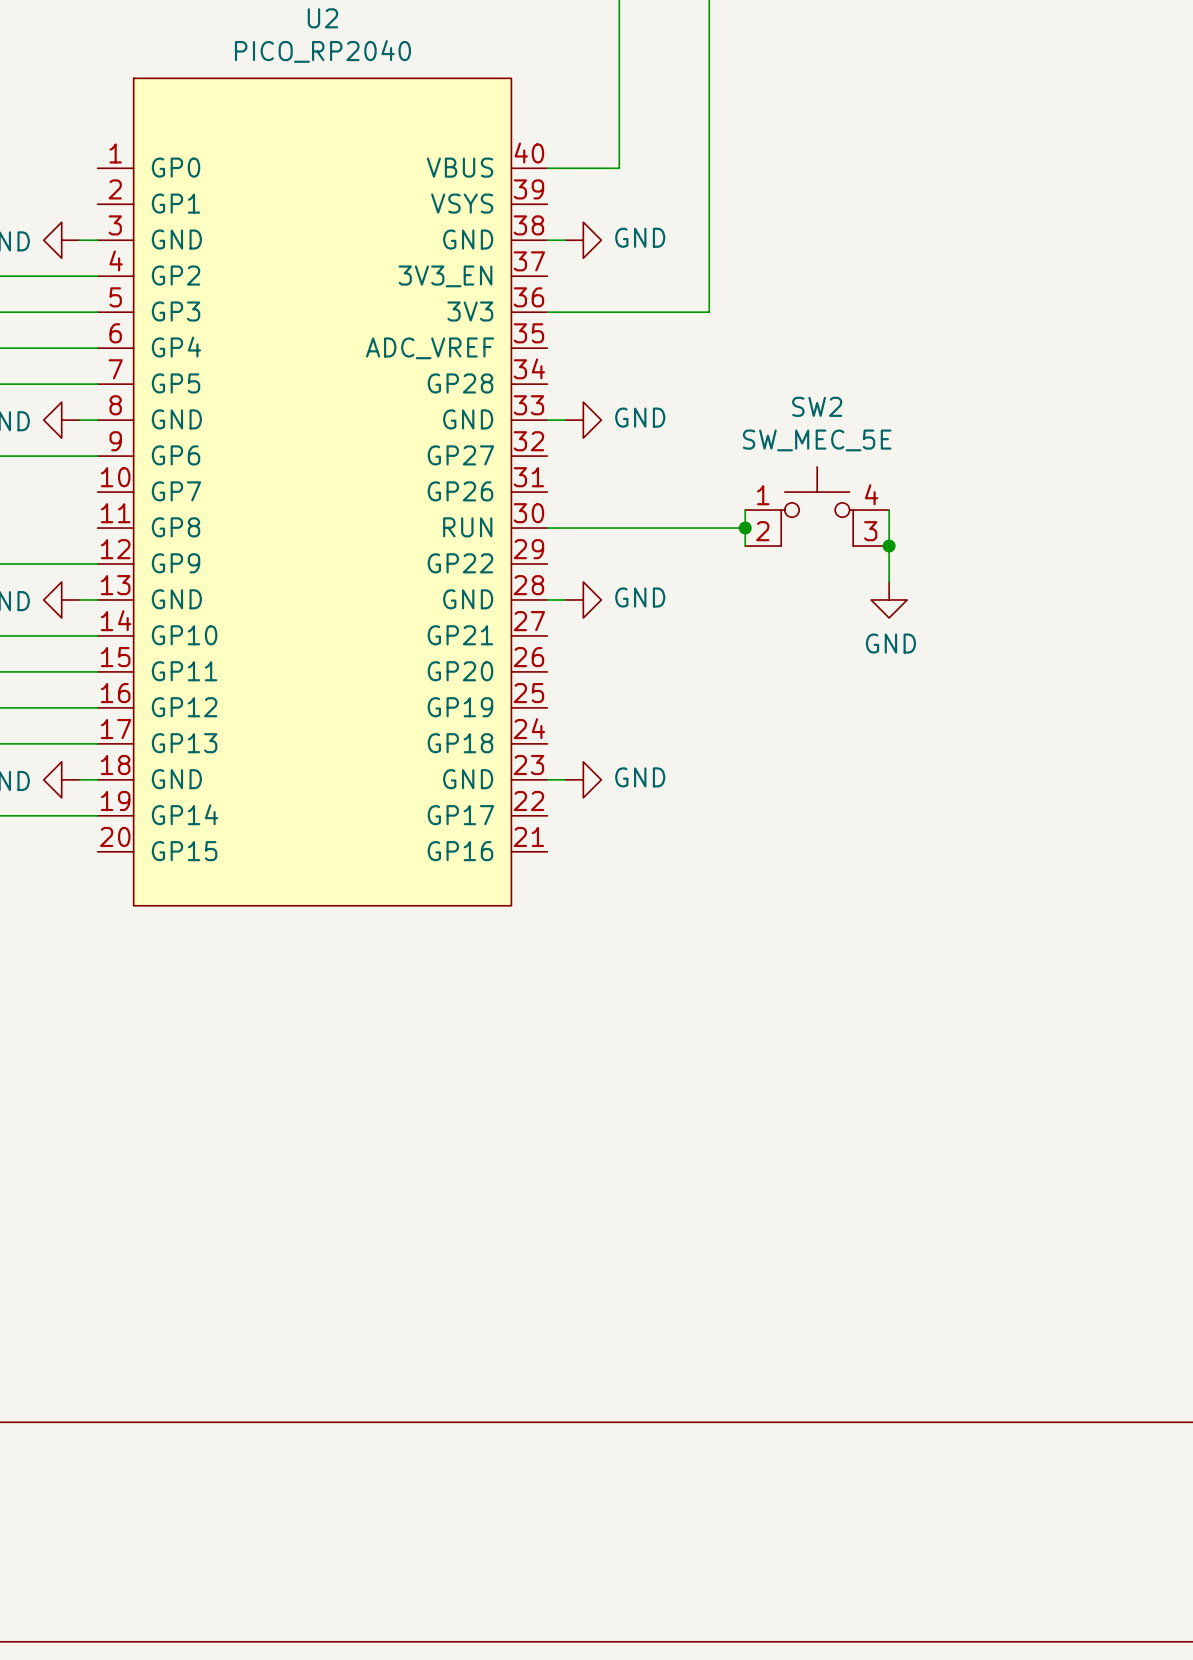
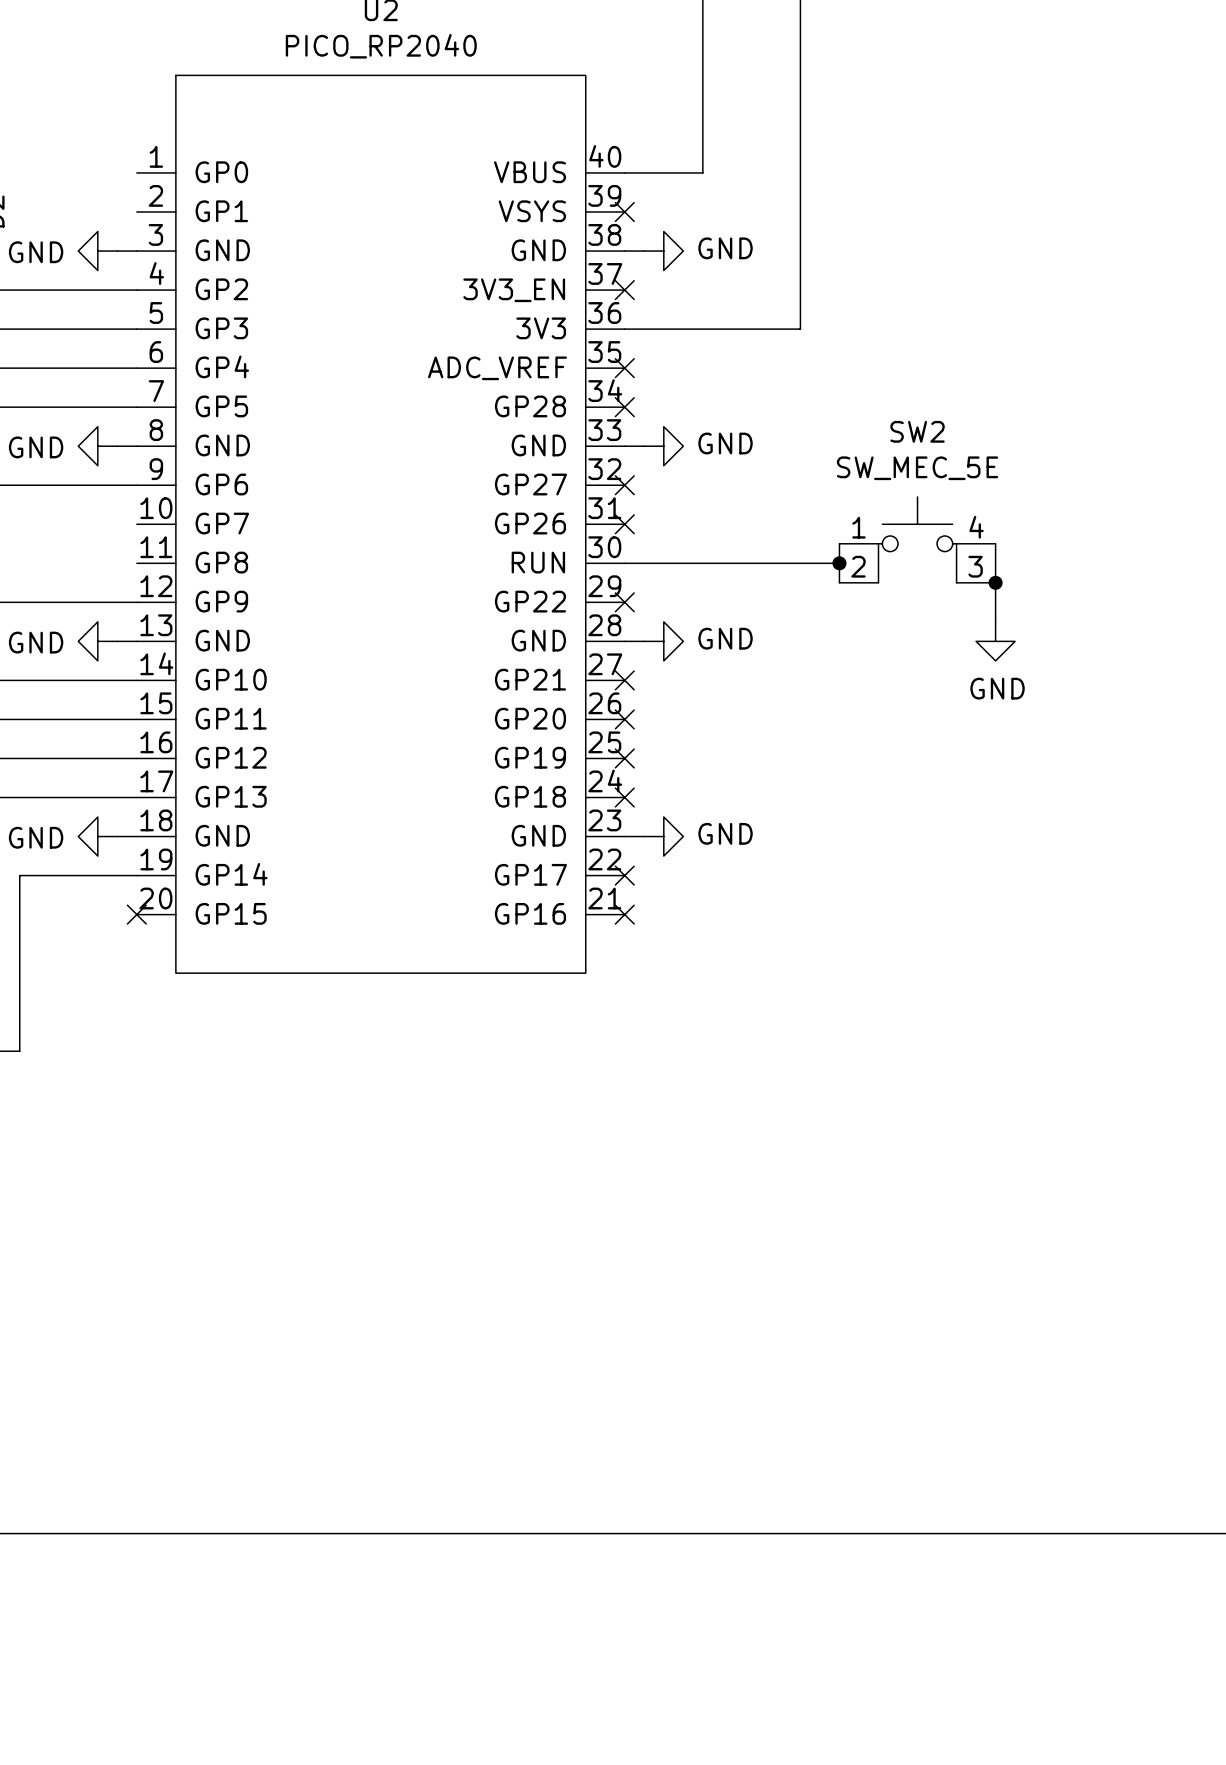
no-connect mark: none -> (624, 212)
no-connect mark: none -> (624, 290)
no-connect mark: none -> (624, 368)
no-connect mark: none -> (624, 407)
no-connect mark: none -> (624, 485)
no-connect mark: none -> (624, 524)
no-connect mark: none -> (624, 602)
no-connect mark: none -> (624, 680)
no-connect mark: none -> (624, 719)
no-connect mark: none -> (624, 758)
no-connect mark: none -> (624, 797)
no-connect mark: none -> (624, 875)
no-connect mark: none -> (136, 914)
no-connect mark: none -> (624, 914)

